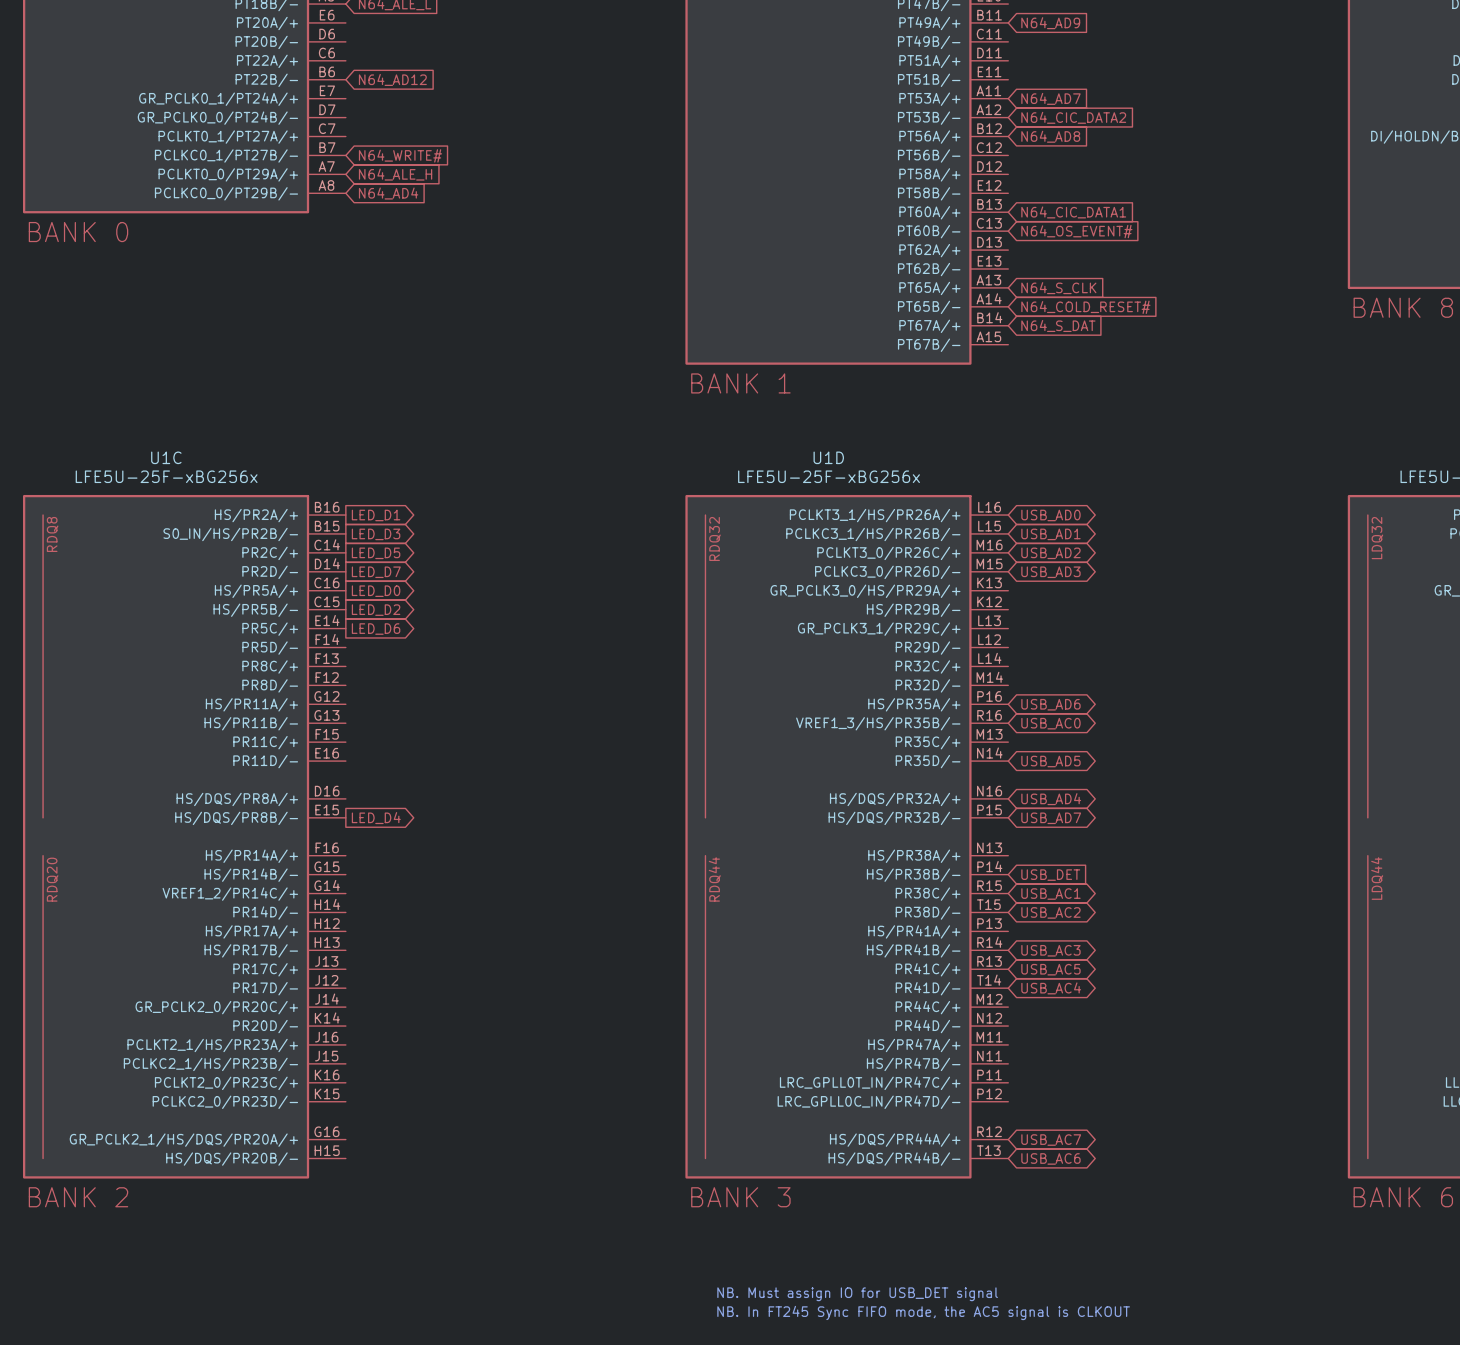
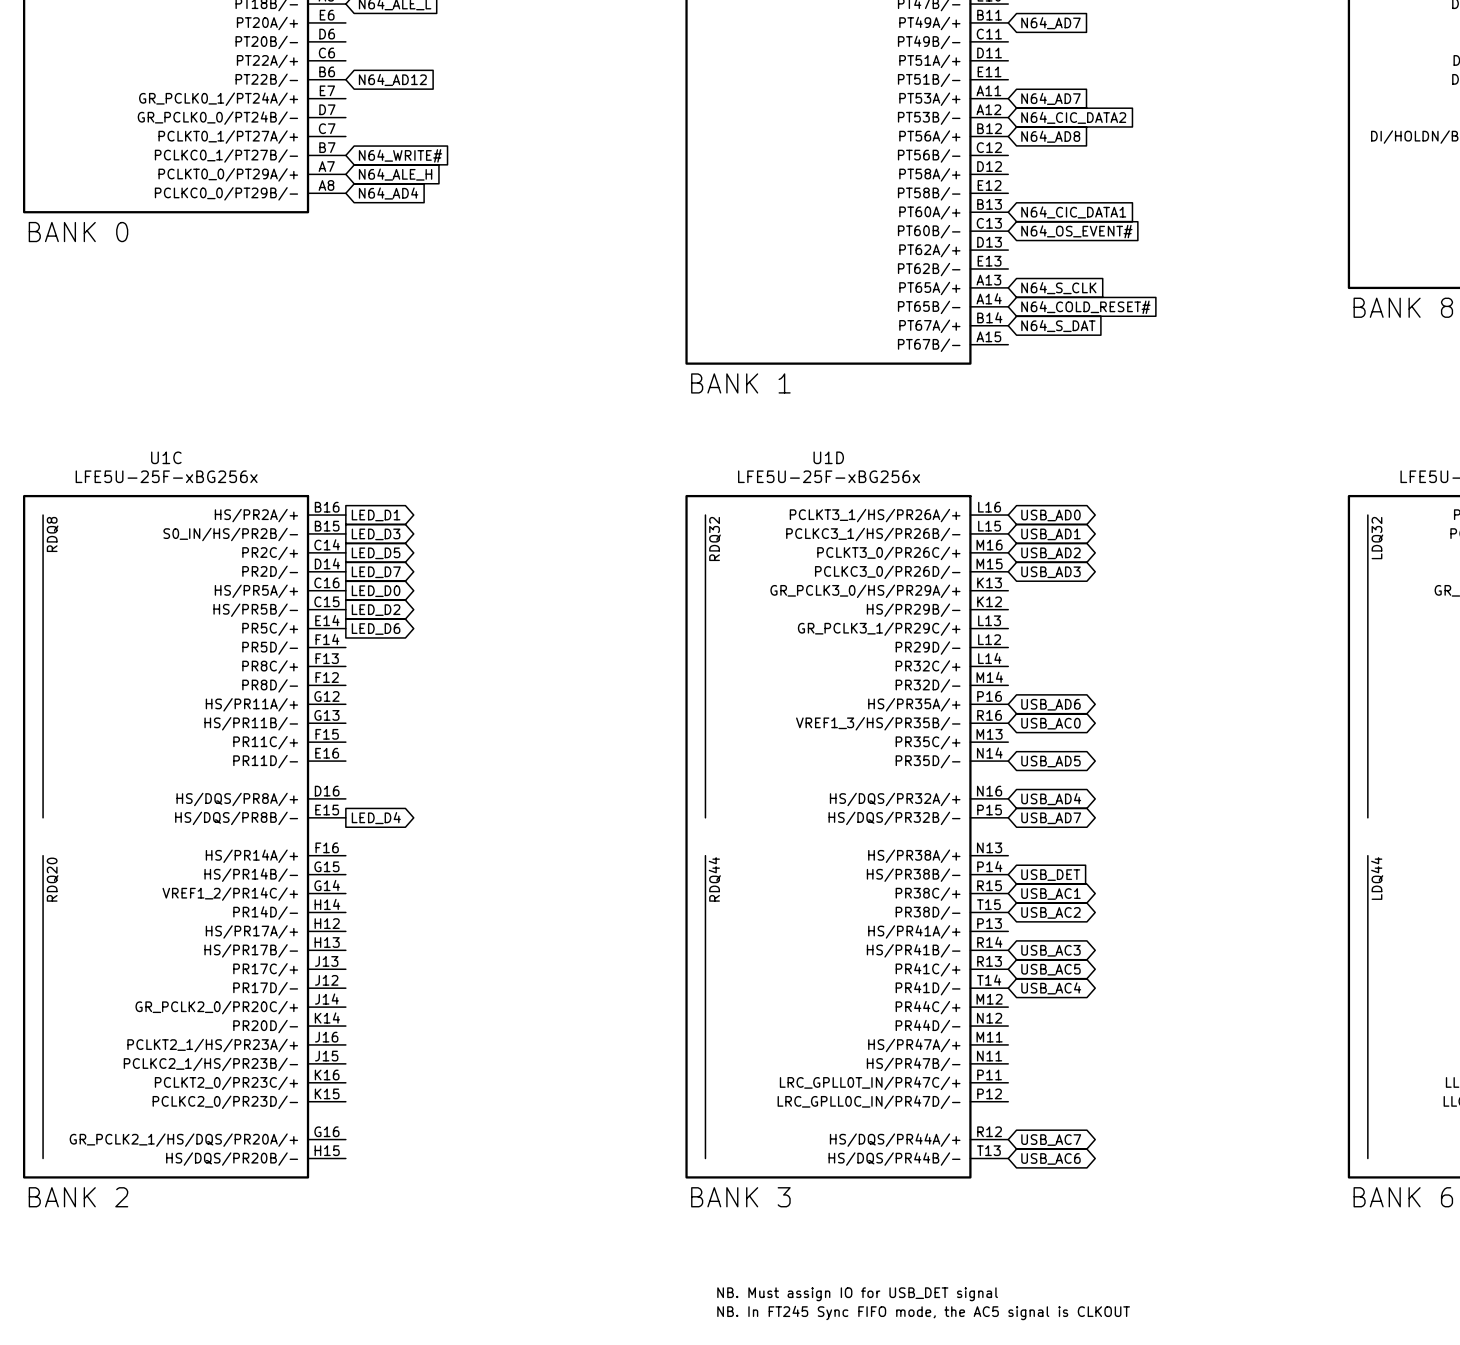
global label: N64_AD9 (1050, 23) -> N64_AD7 (1050, 23)

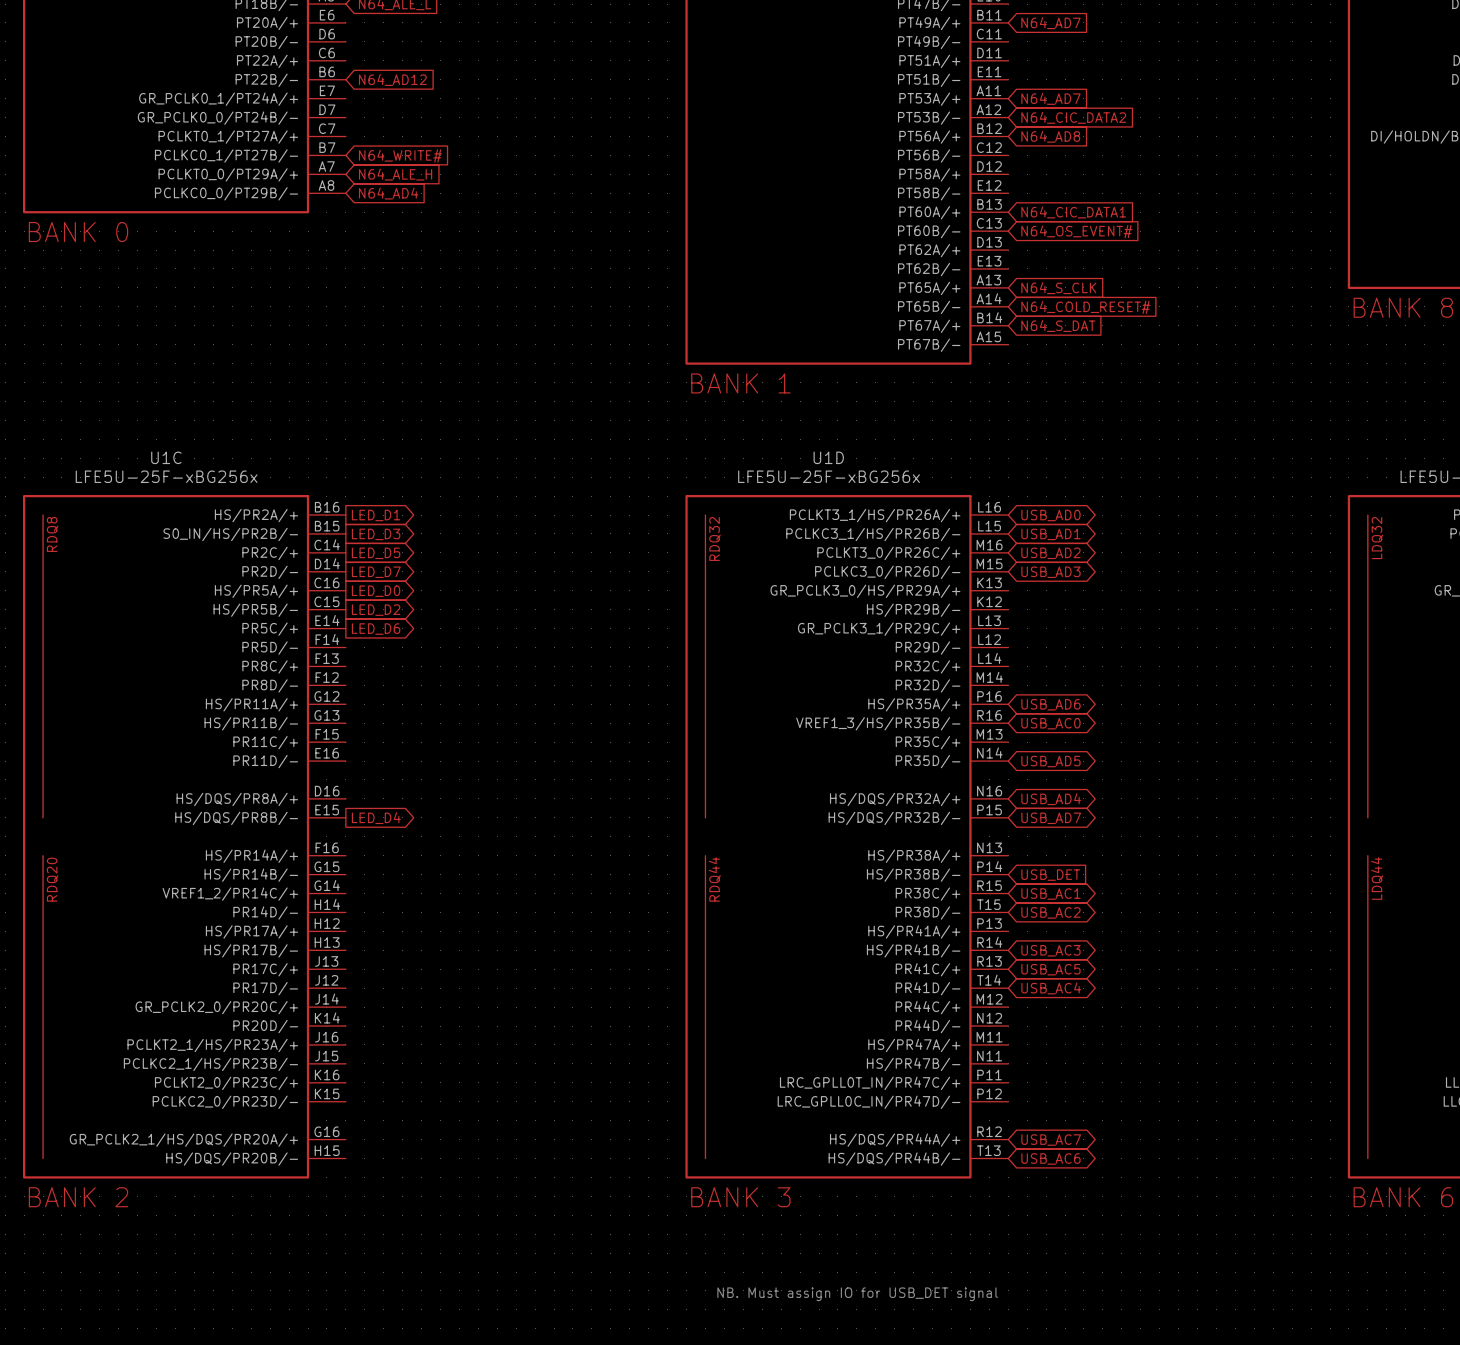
text: NB. In FT245 Sync FIFO mode, the AC5 signal is CLKOUT (923, 1312) -> none

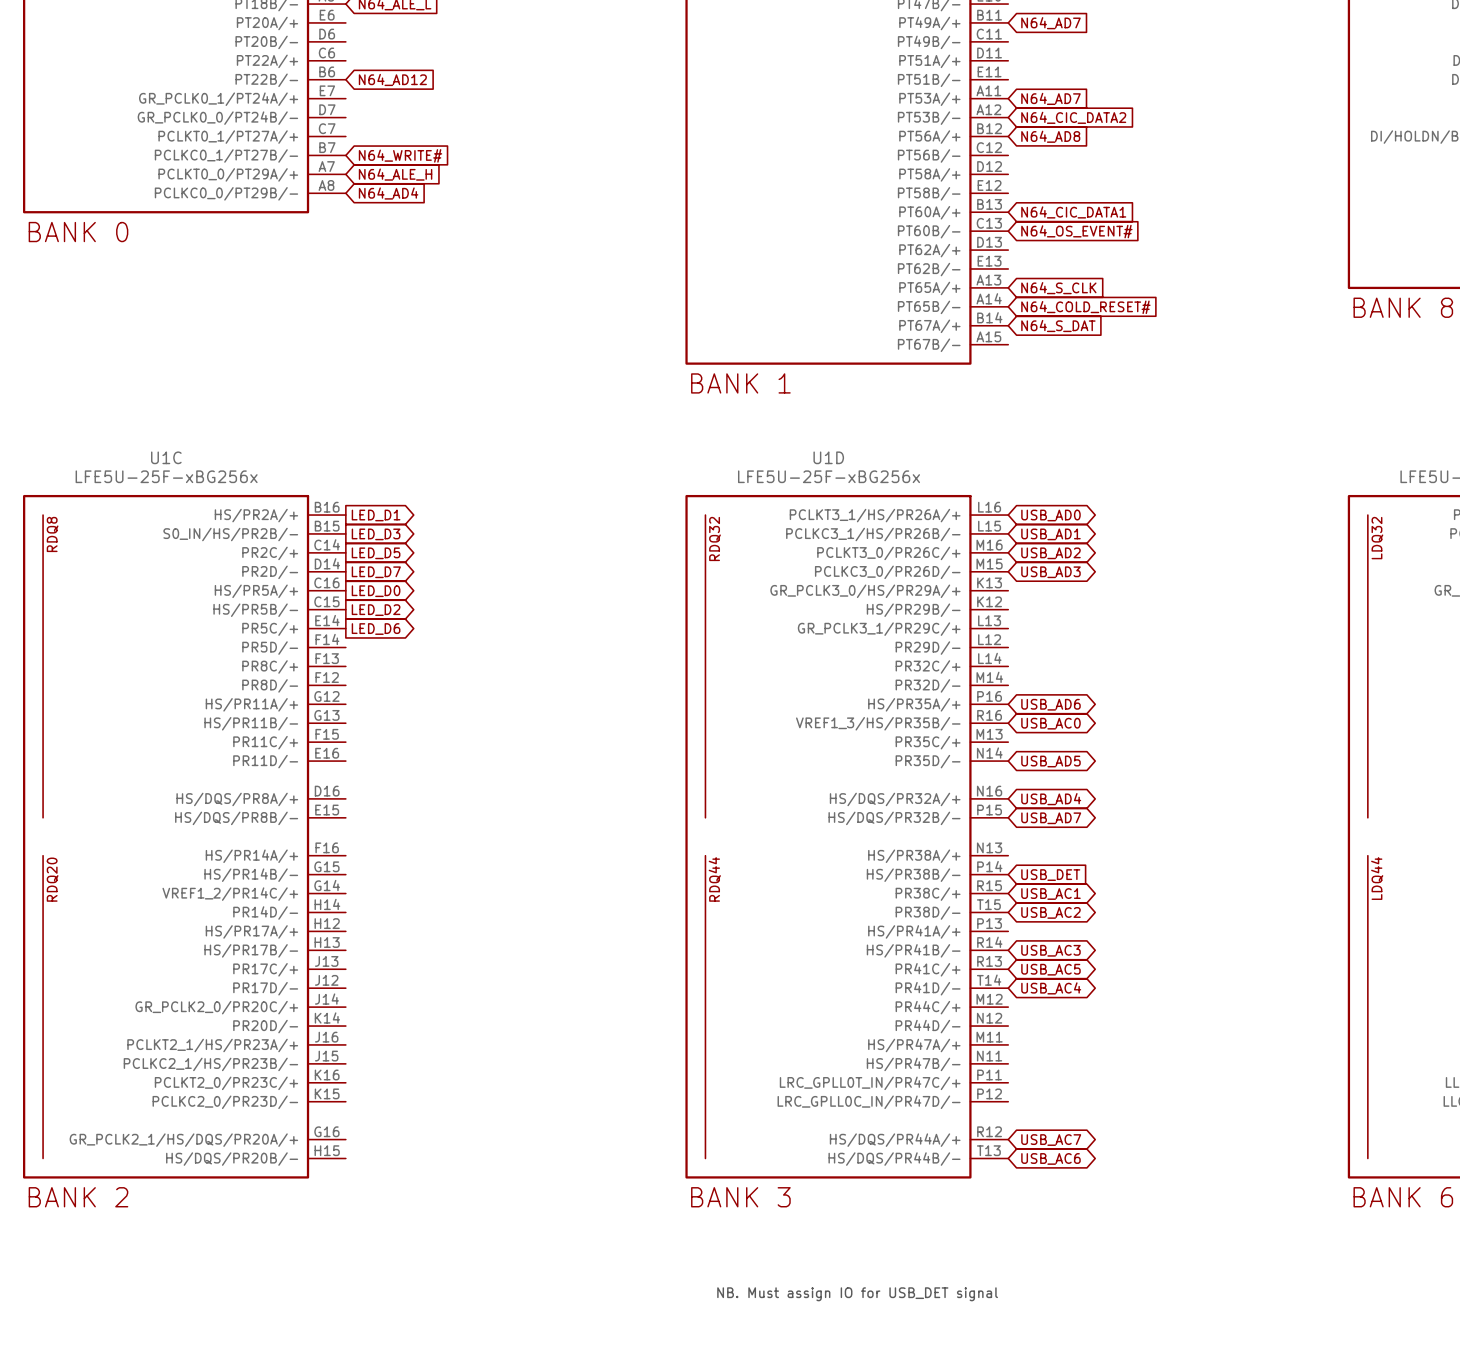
global label: LED_D4 (376, 818) -> none

